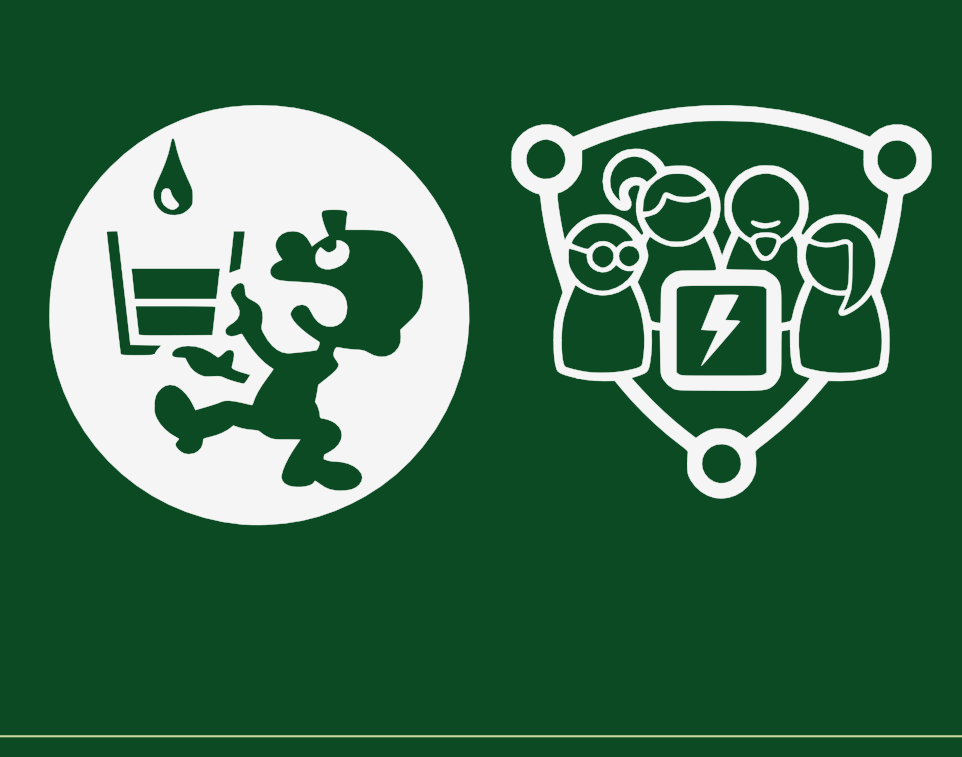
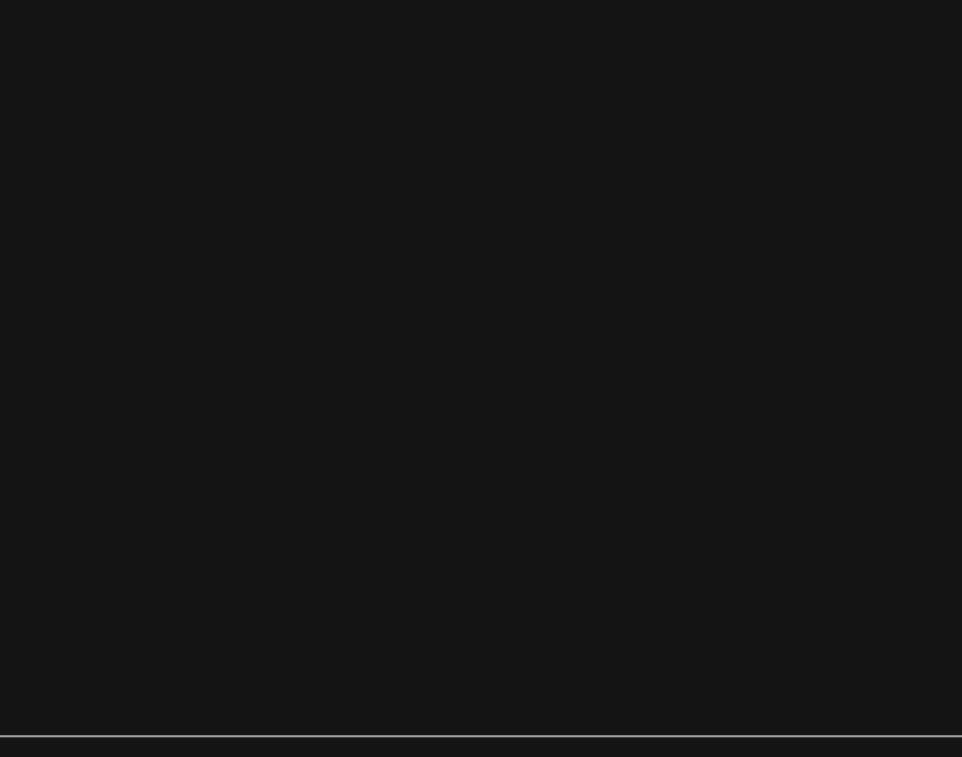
drawing: [49, 105, 932, 526] -> none

